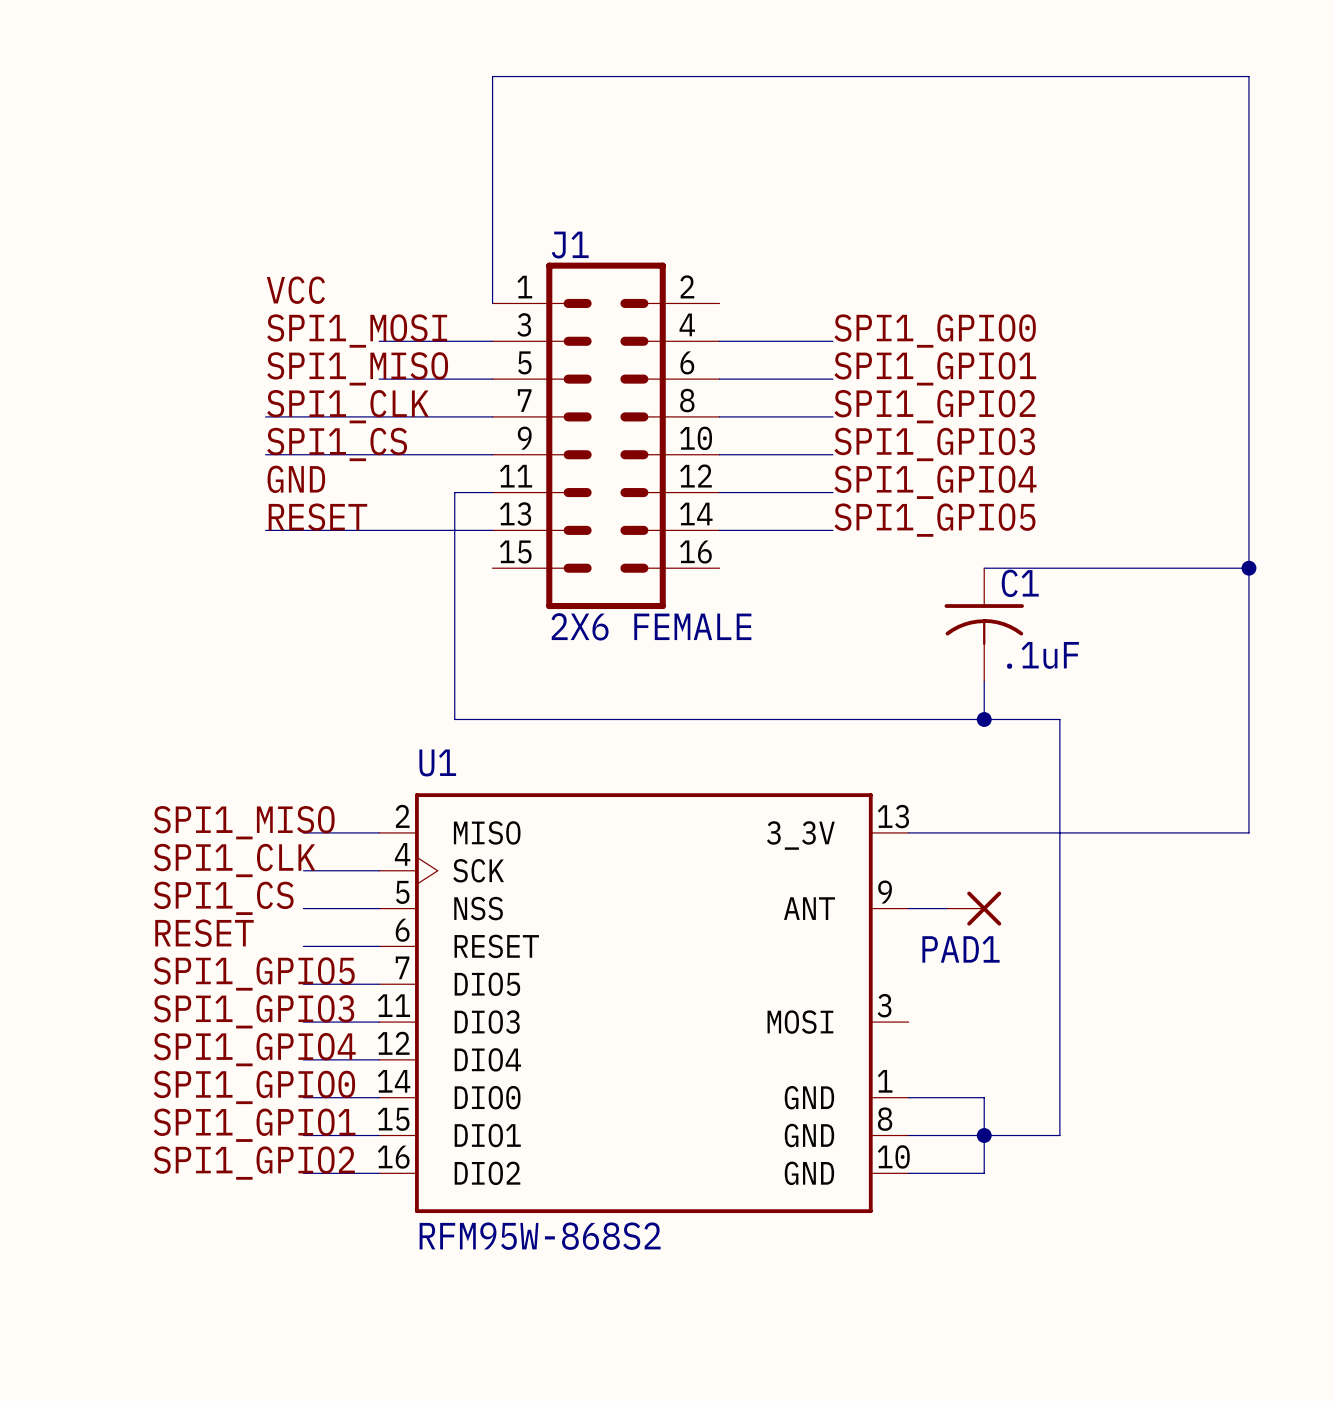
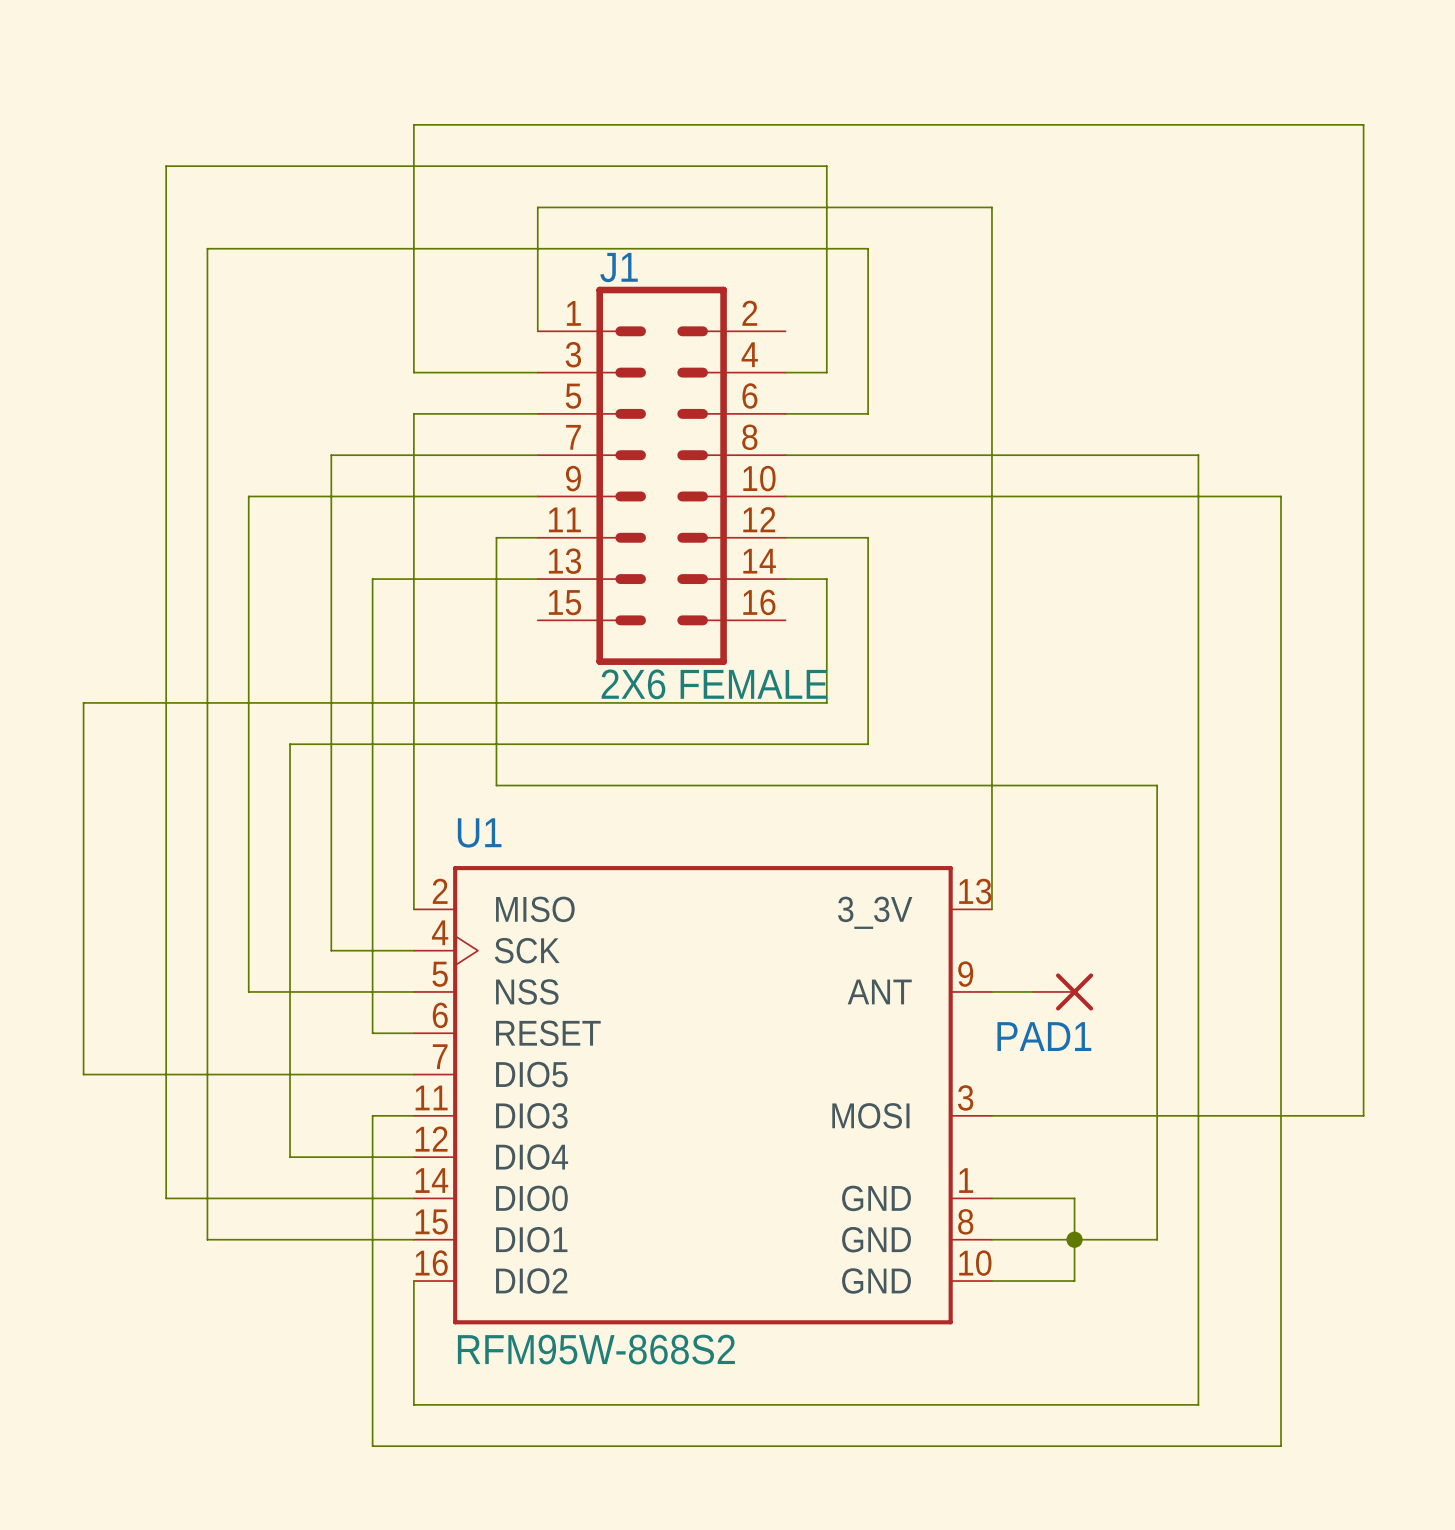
wire: (1248, 114) (1248, 76) (492, 76) (492, 190) -> (1363, 124) (413, 124) (413, 372)
wire: none -> (537, 207) (991, 207) (991, 909)
label: VCC (295, 290) -> none
label: SPI1_MOSI (357, 331) -> none
label: SPI1_GPIO0 (935, 331) -> none
wire: (757, 341) (832, 341) -> (826, 372) (826, 166) (166, 166) (166, 1198) (331, 1198)
label: SPI1_MISO (357, 368) -> none
label: SPI1_GPIO1 (935, 368) -> none
wire: (795, 379) (832, 379) -> (868, 413) (868, 248) (207, 248) (207, 1239) (331, 1239)
label: SPI1_CLK (347, 406) -> none
label: SPI1_GPIO2 (935, 406) -> none
wire: (265, 416) (303, 416) -> (331, 950) (331, 455)
label: SPI1_CS (337, 444) -> none
label: SPI1_GPIO3 (934, 444) -> none
wire: none -> (290, 496) (248, 496) (248, 991) (331, 991)
label: GND (296, 479) -> none
label: SPI1_GPIO4 (935, 482) -> none
wire: (795, 492) (832, 492) -> (868, 537) (868, 744) (290, 744) (290, 1157) (331, 1157)
label: RESET (317, 517) -> none
label: SPI1_GPIO5 (934, 520) -> none
wire: (265, 530) (341, 530) -> none
wire: (757, 530) (832, 530) -> (826, 579) (826, 702) (83, 702) (83, 1074) (331, 1074)
wire: (984, 568) (1248, 568) -> none
junction: (1248, 568) -> none
C1: .1uF (984, 624) -> none
wire: (984, 681) (984, 719) -> none
junction: (984, 719) -> none
label: SPI1_MISO (244, 822) -> none
wire: (303, 832) (379, 832) -> (413, 413) (413, 909)
wire: (908, 832) (1248, 832) -> (991, 1115) (1363, 1115) (1363, 909)
label: SPI1_CLK (234, 860) -> none
label: SPI1_CS (223, 898) -> none
label: RESET (204, 933) -> none
wire: (303, 946) (341, 946) -> (372, 579) (372, 1033)
label: SPI1_GPIO5 (254, 973) -> none
label: SPI1_GPIO3 (253, 1011) -> none
wire: (303, 1022) (341, 1022) -> (909, 496) (1281, 496) (1281, 1446) (372, 1446) (372, 1115)
label: SPI1_GPIO4 (254, 1049) -> none
label: SPI1_GPIO0 (254, 1087) -> none
label: SPI1_GPIO1 (254, 1125) -> none
label: SPI1_GPIO2 (254, 1163) -> none
wire: (303, 1173) (379, 1173) -> (909, 455) (1198, 455) (1198, 1404) (413, 1404) (413, 1281)

